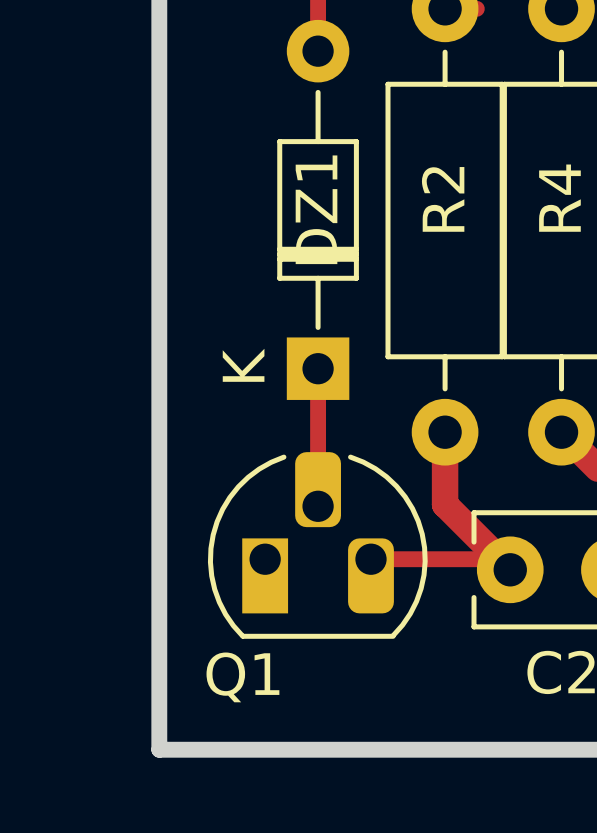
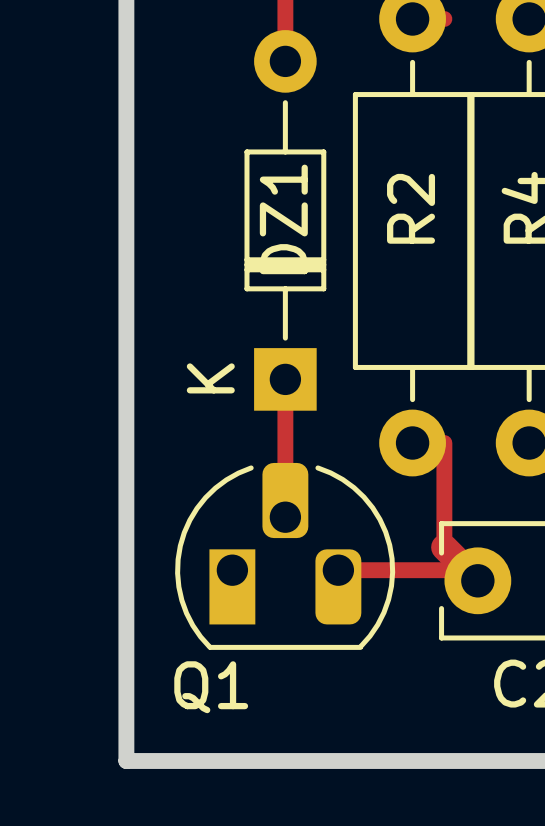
track: (445, 432) (445, 504) (476, 536) -> (444, 443) (444, 547)

